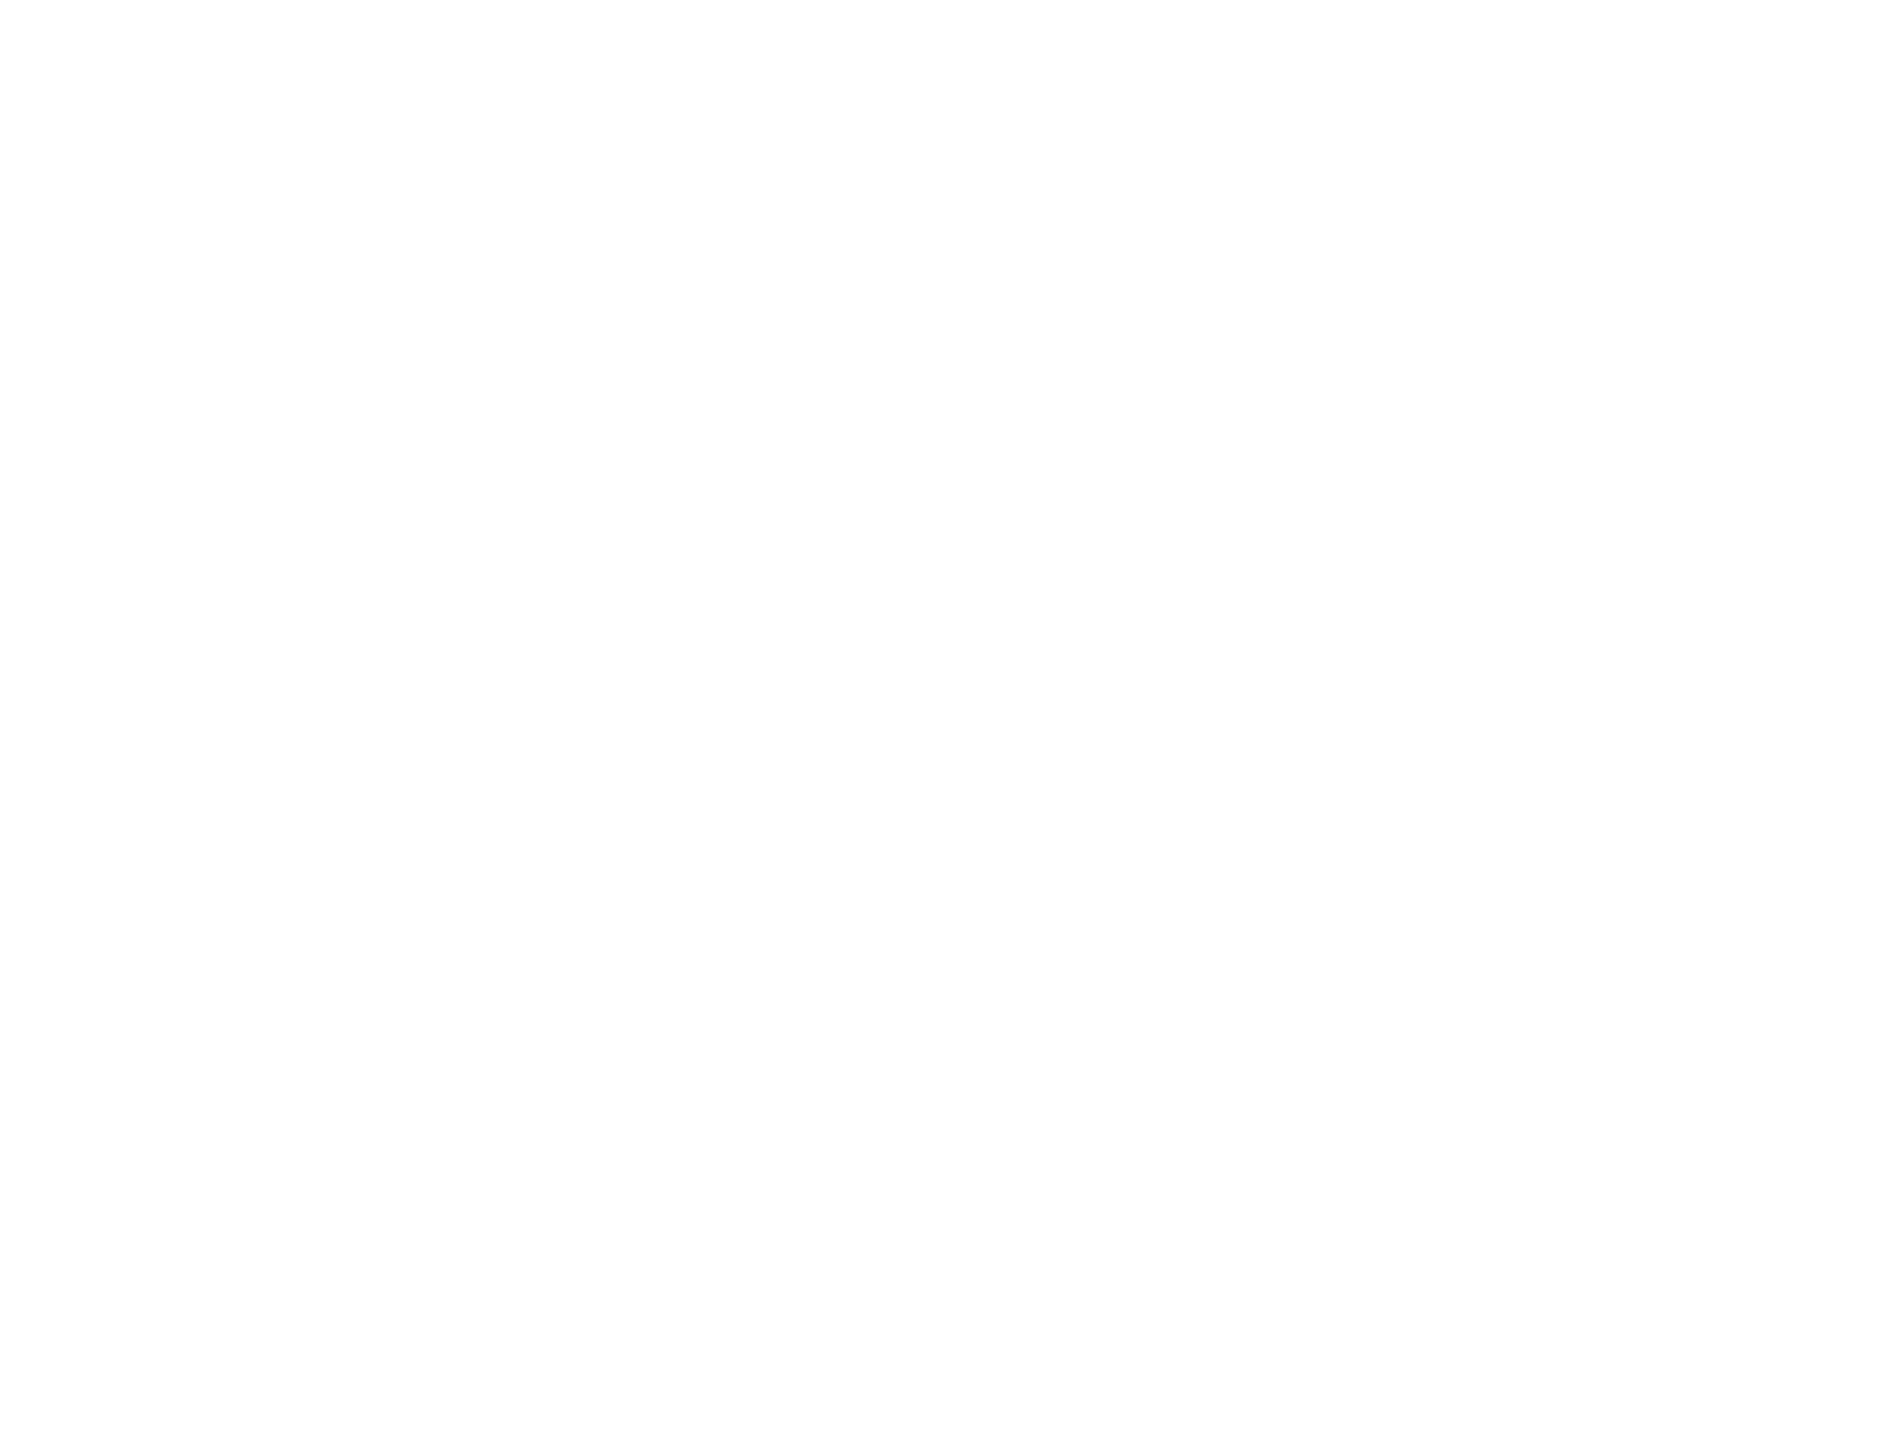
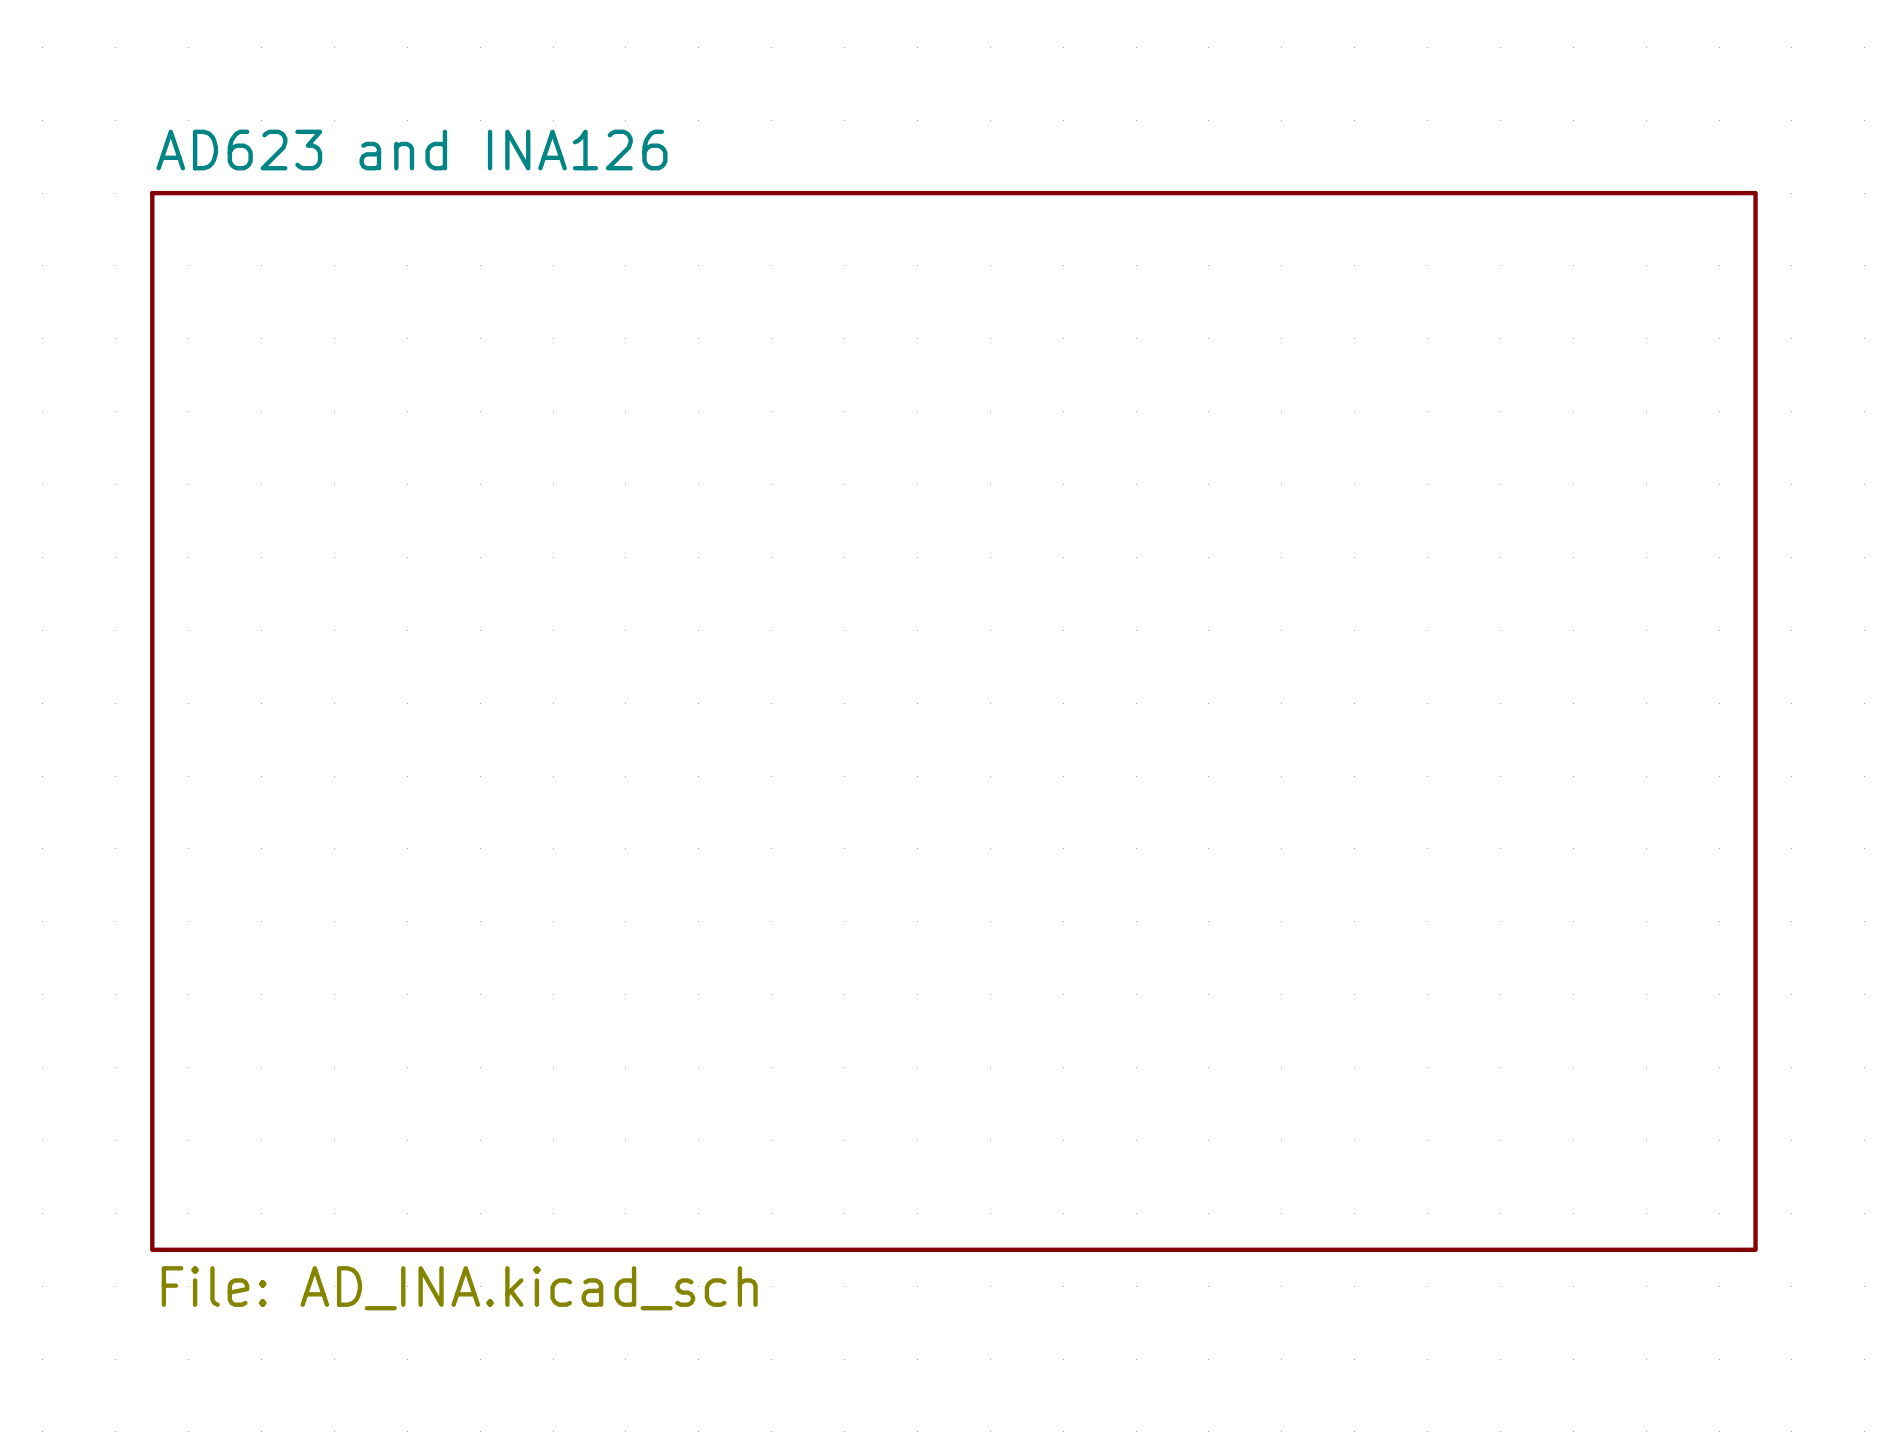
sheet AD623 and INA126: none -> File: AD_INA.kicad_sch (953, 721)

